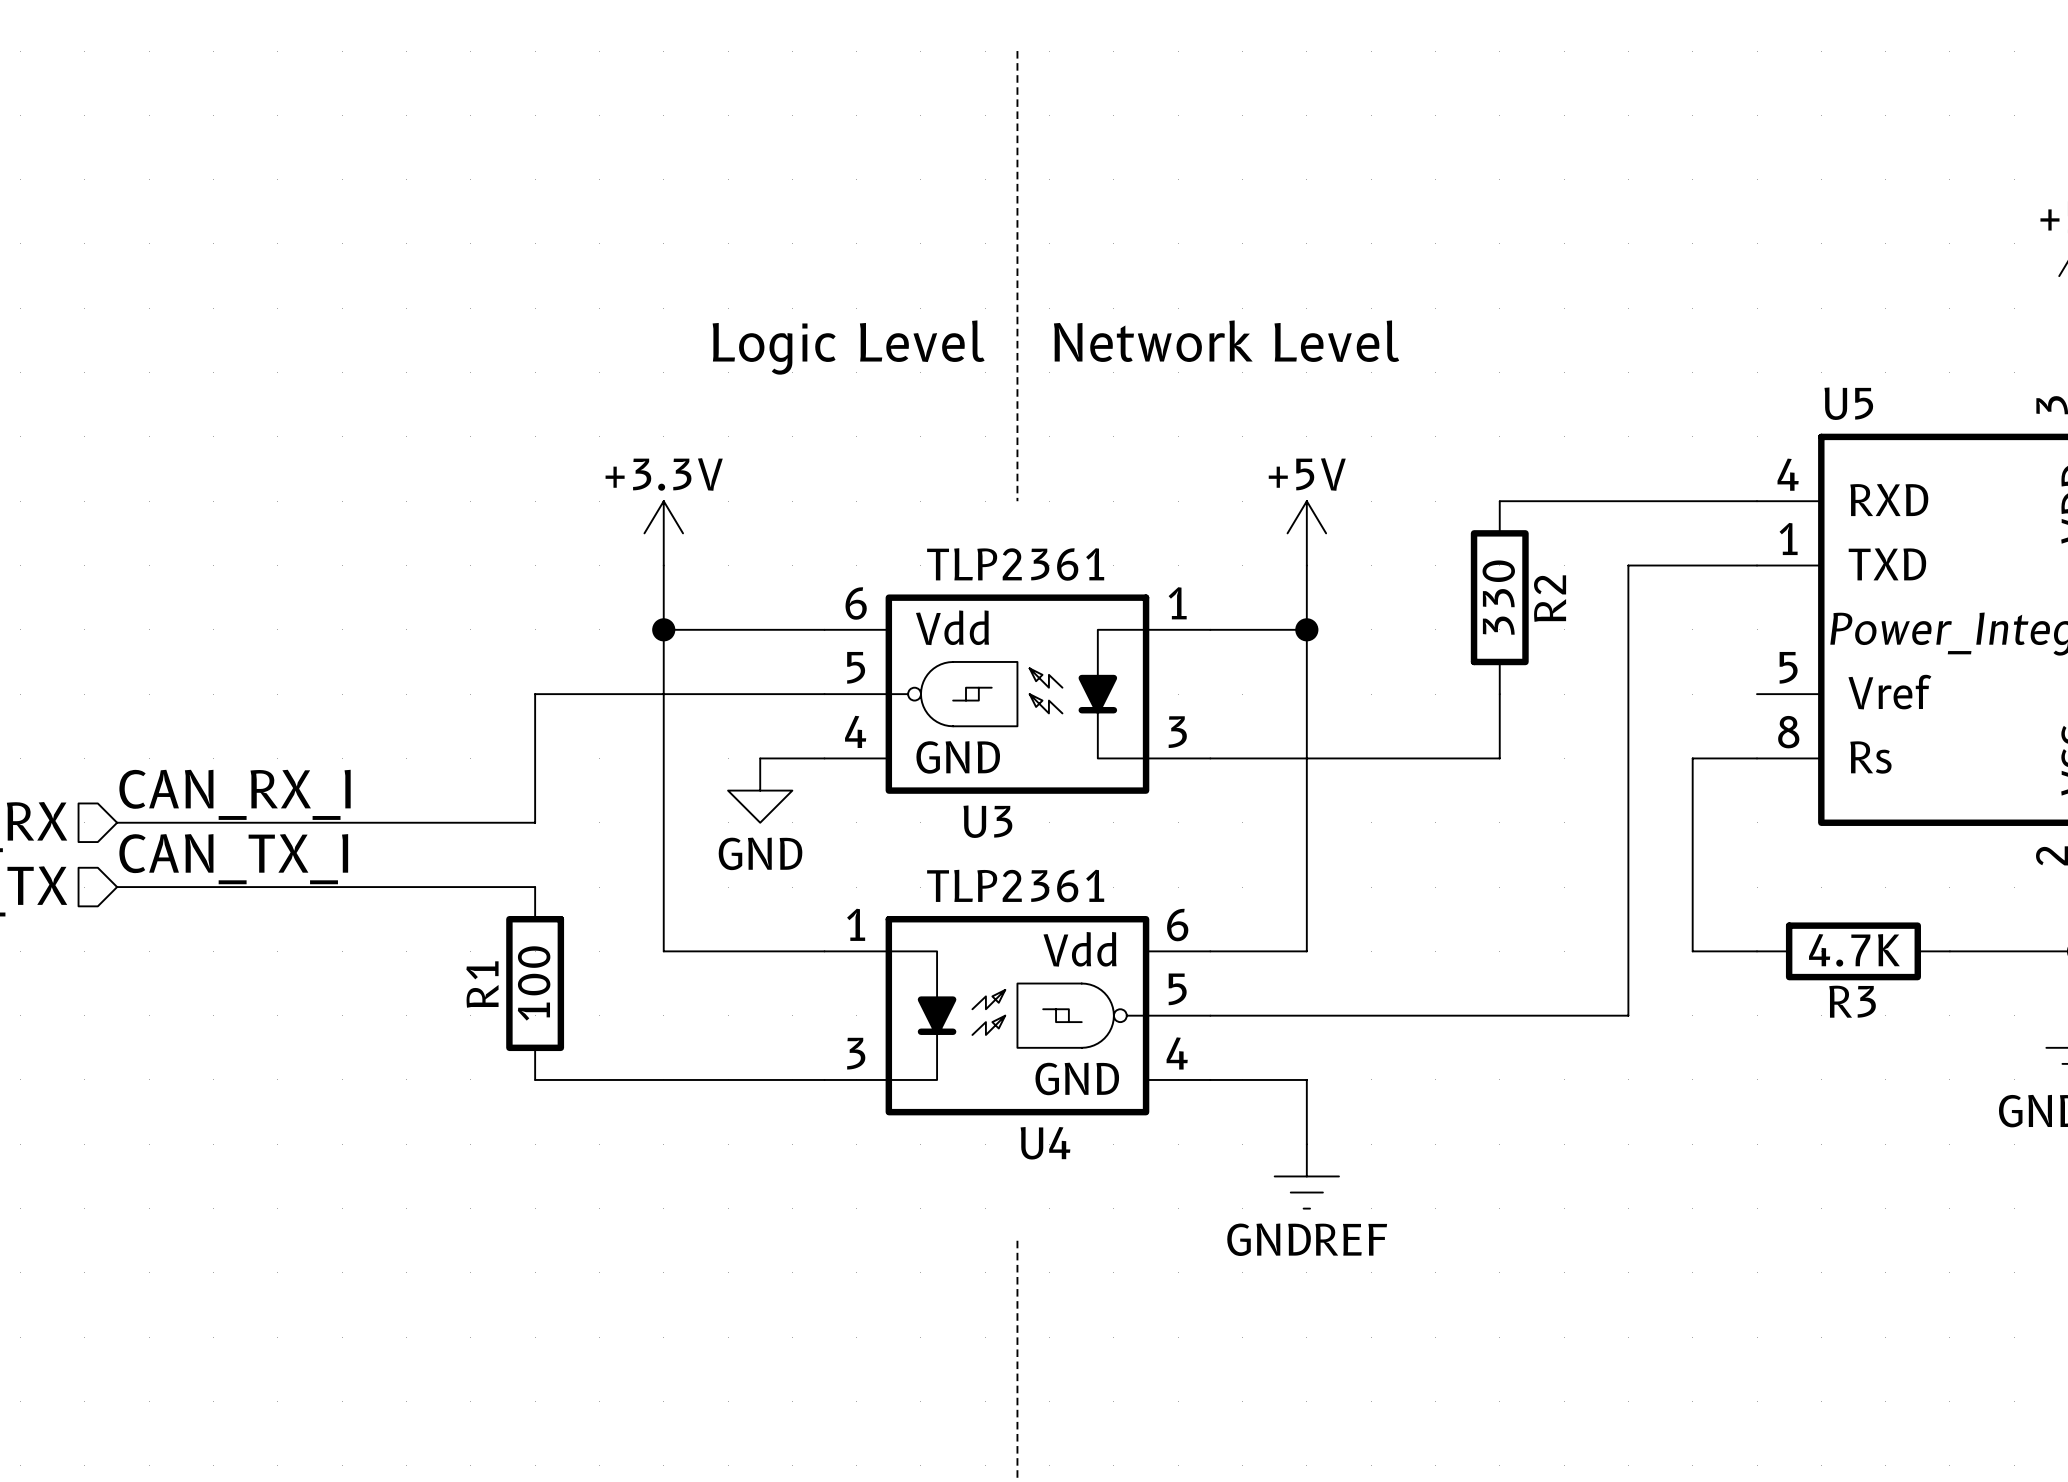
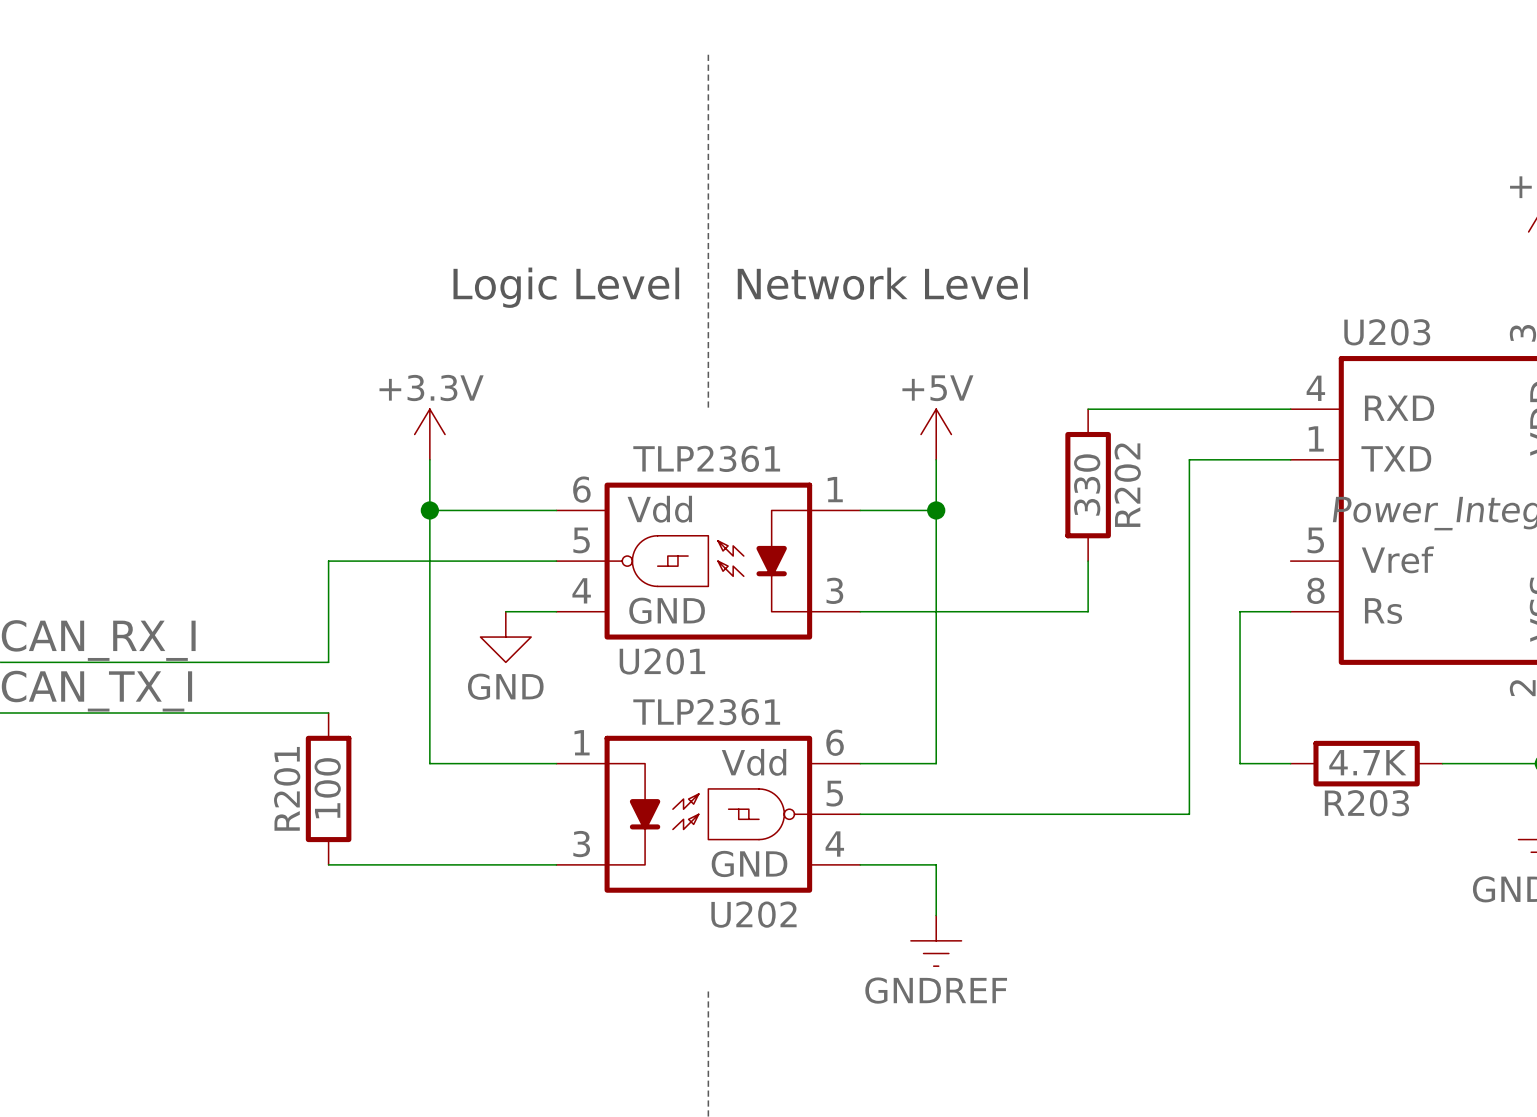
U5 name: U5 (1848, 403) -> U203 (1387, 332)
R2 name: R2 (1550, 598) -> R202 (1127, 485)
U3 name: U3 (987, 821) -> U201 (662, 661)
R1 name: R1 (482, 984) -> R201 (287, 788)
R3 name: R3 (1852, 1001) -> R203 (1366, 803)
U4 name: U4 (1045, 1143) -> U202 (753, 914)

